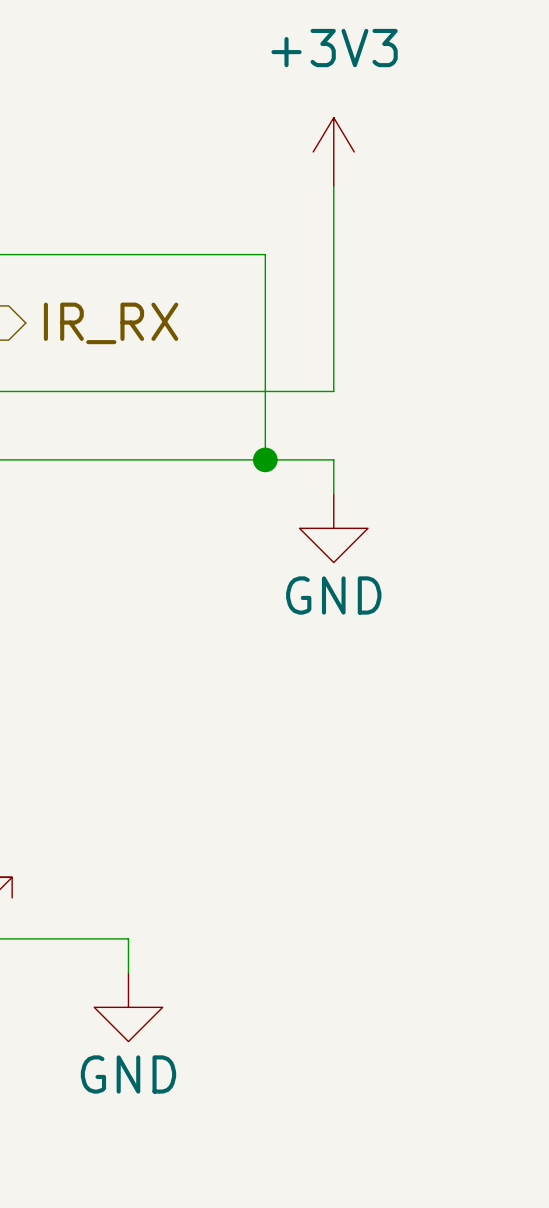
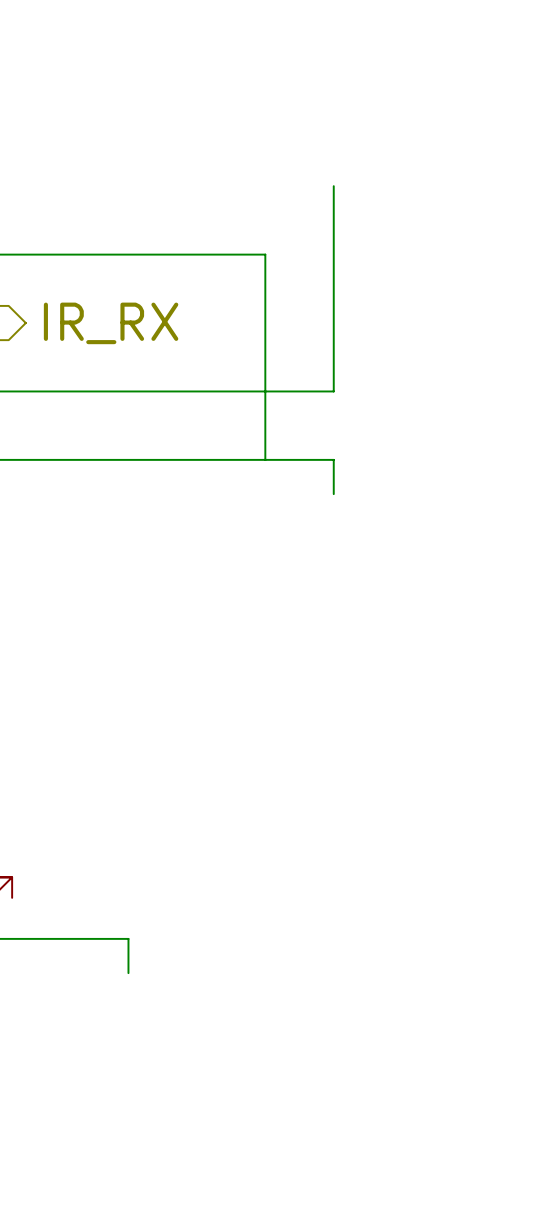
power symbol: +3V3 (333, 151) -> none
junction: (265, 459) -> none
power symbol: GND (333, 528) -> none
power symbol: GND (128, 1007) -> none

